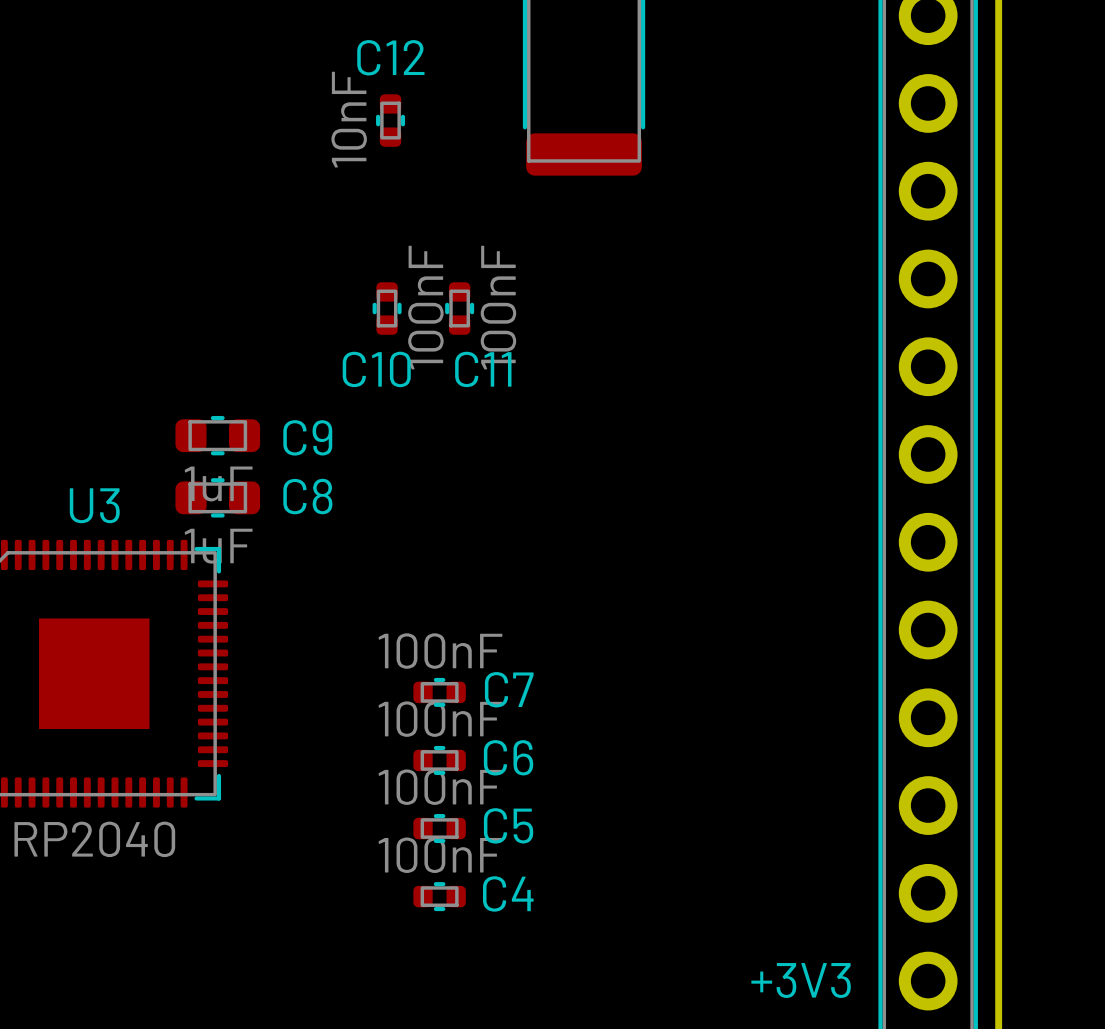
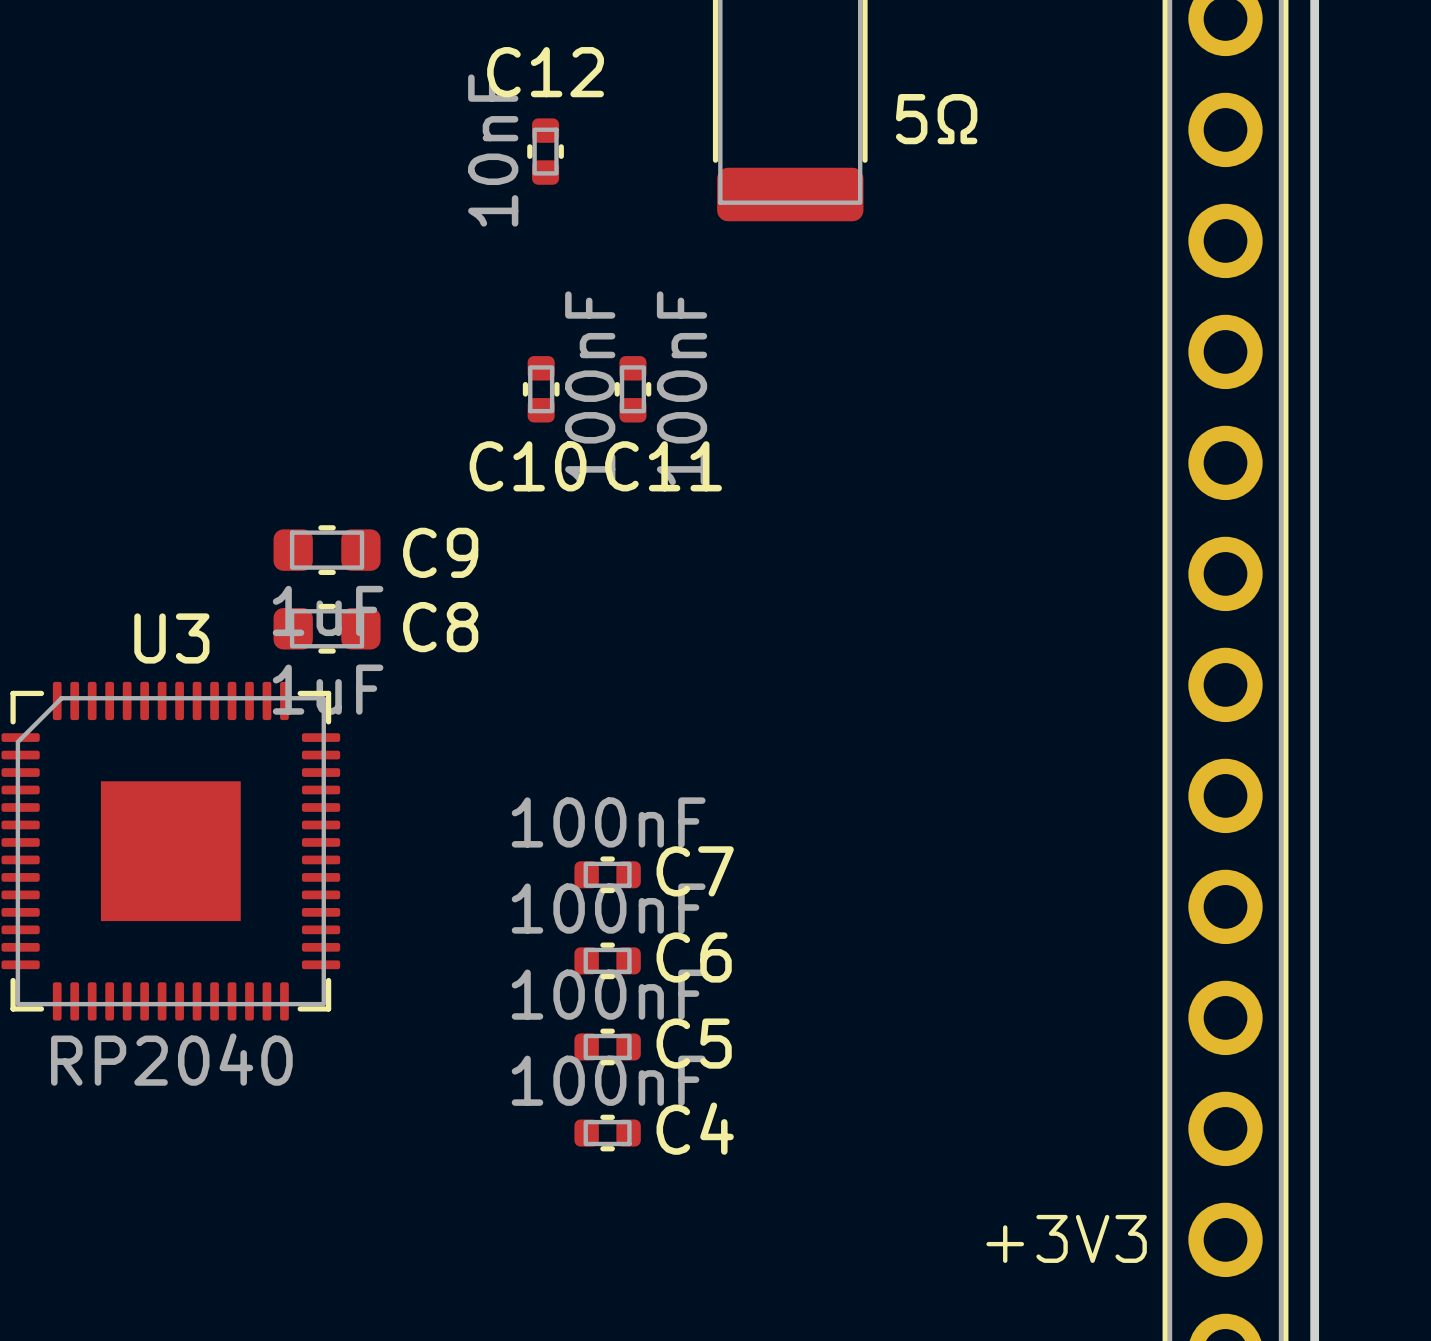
part value: none -> 5Ω (936, 119)

